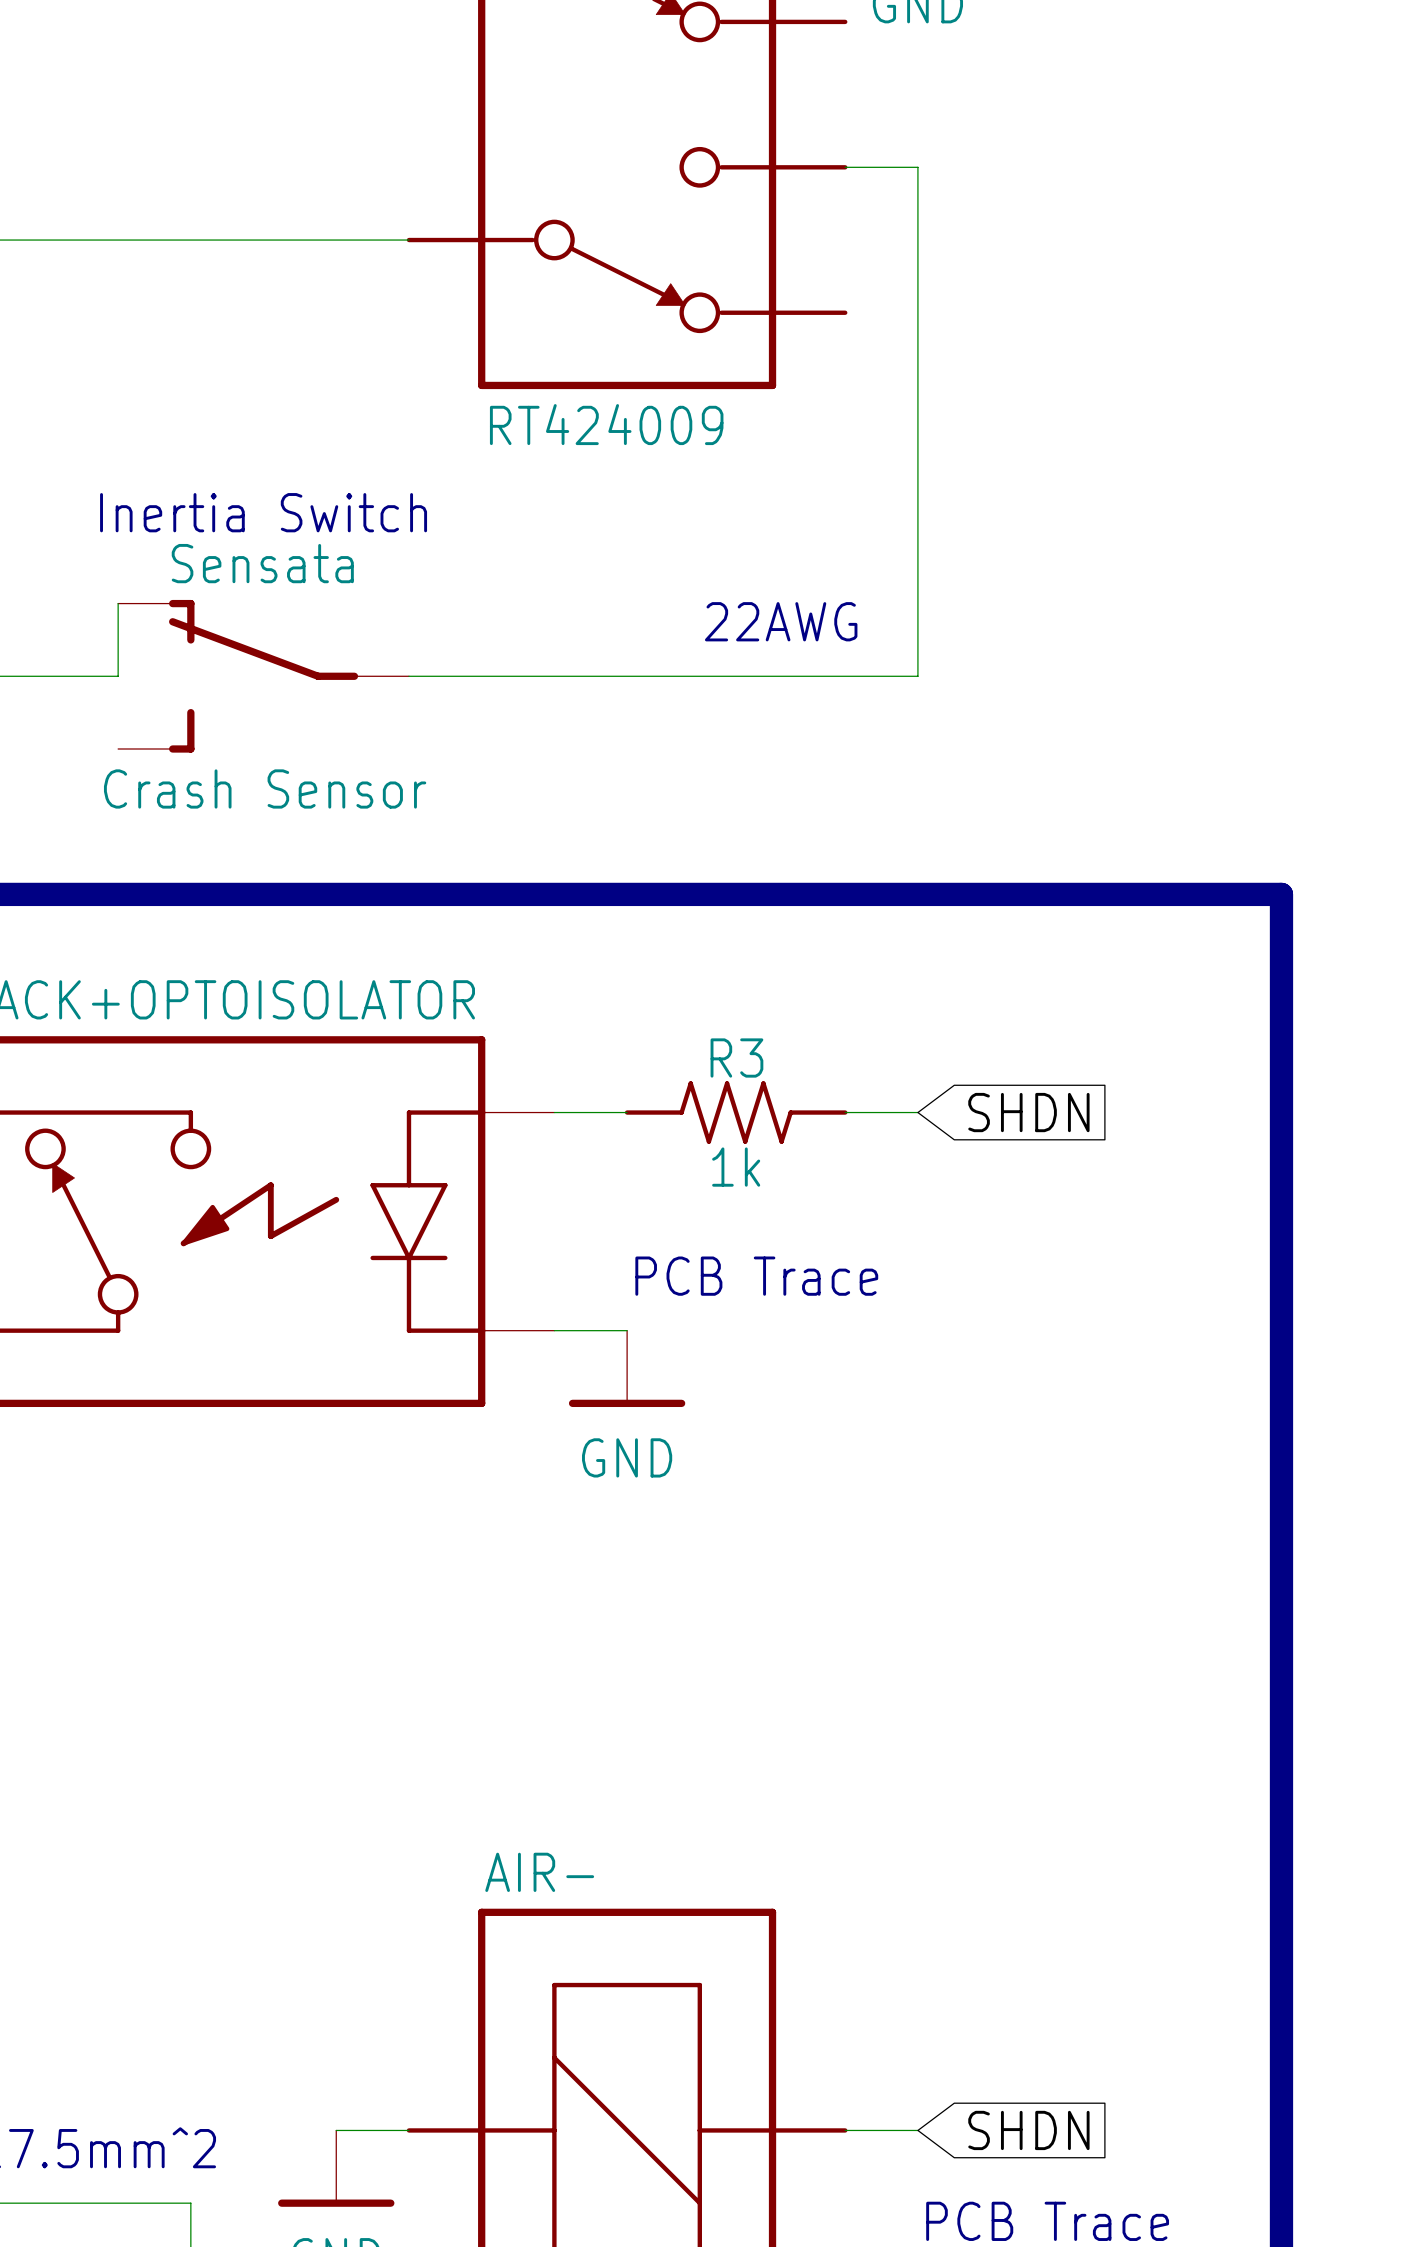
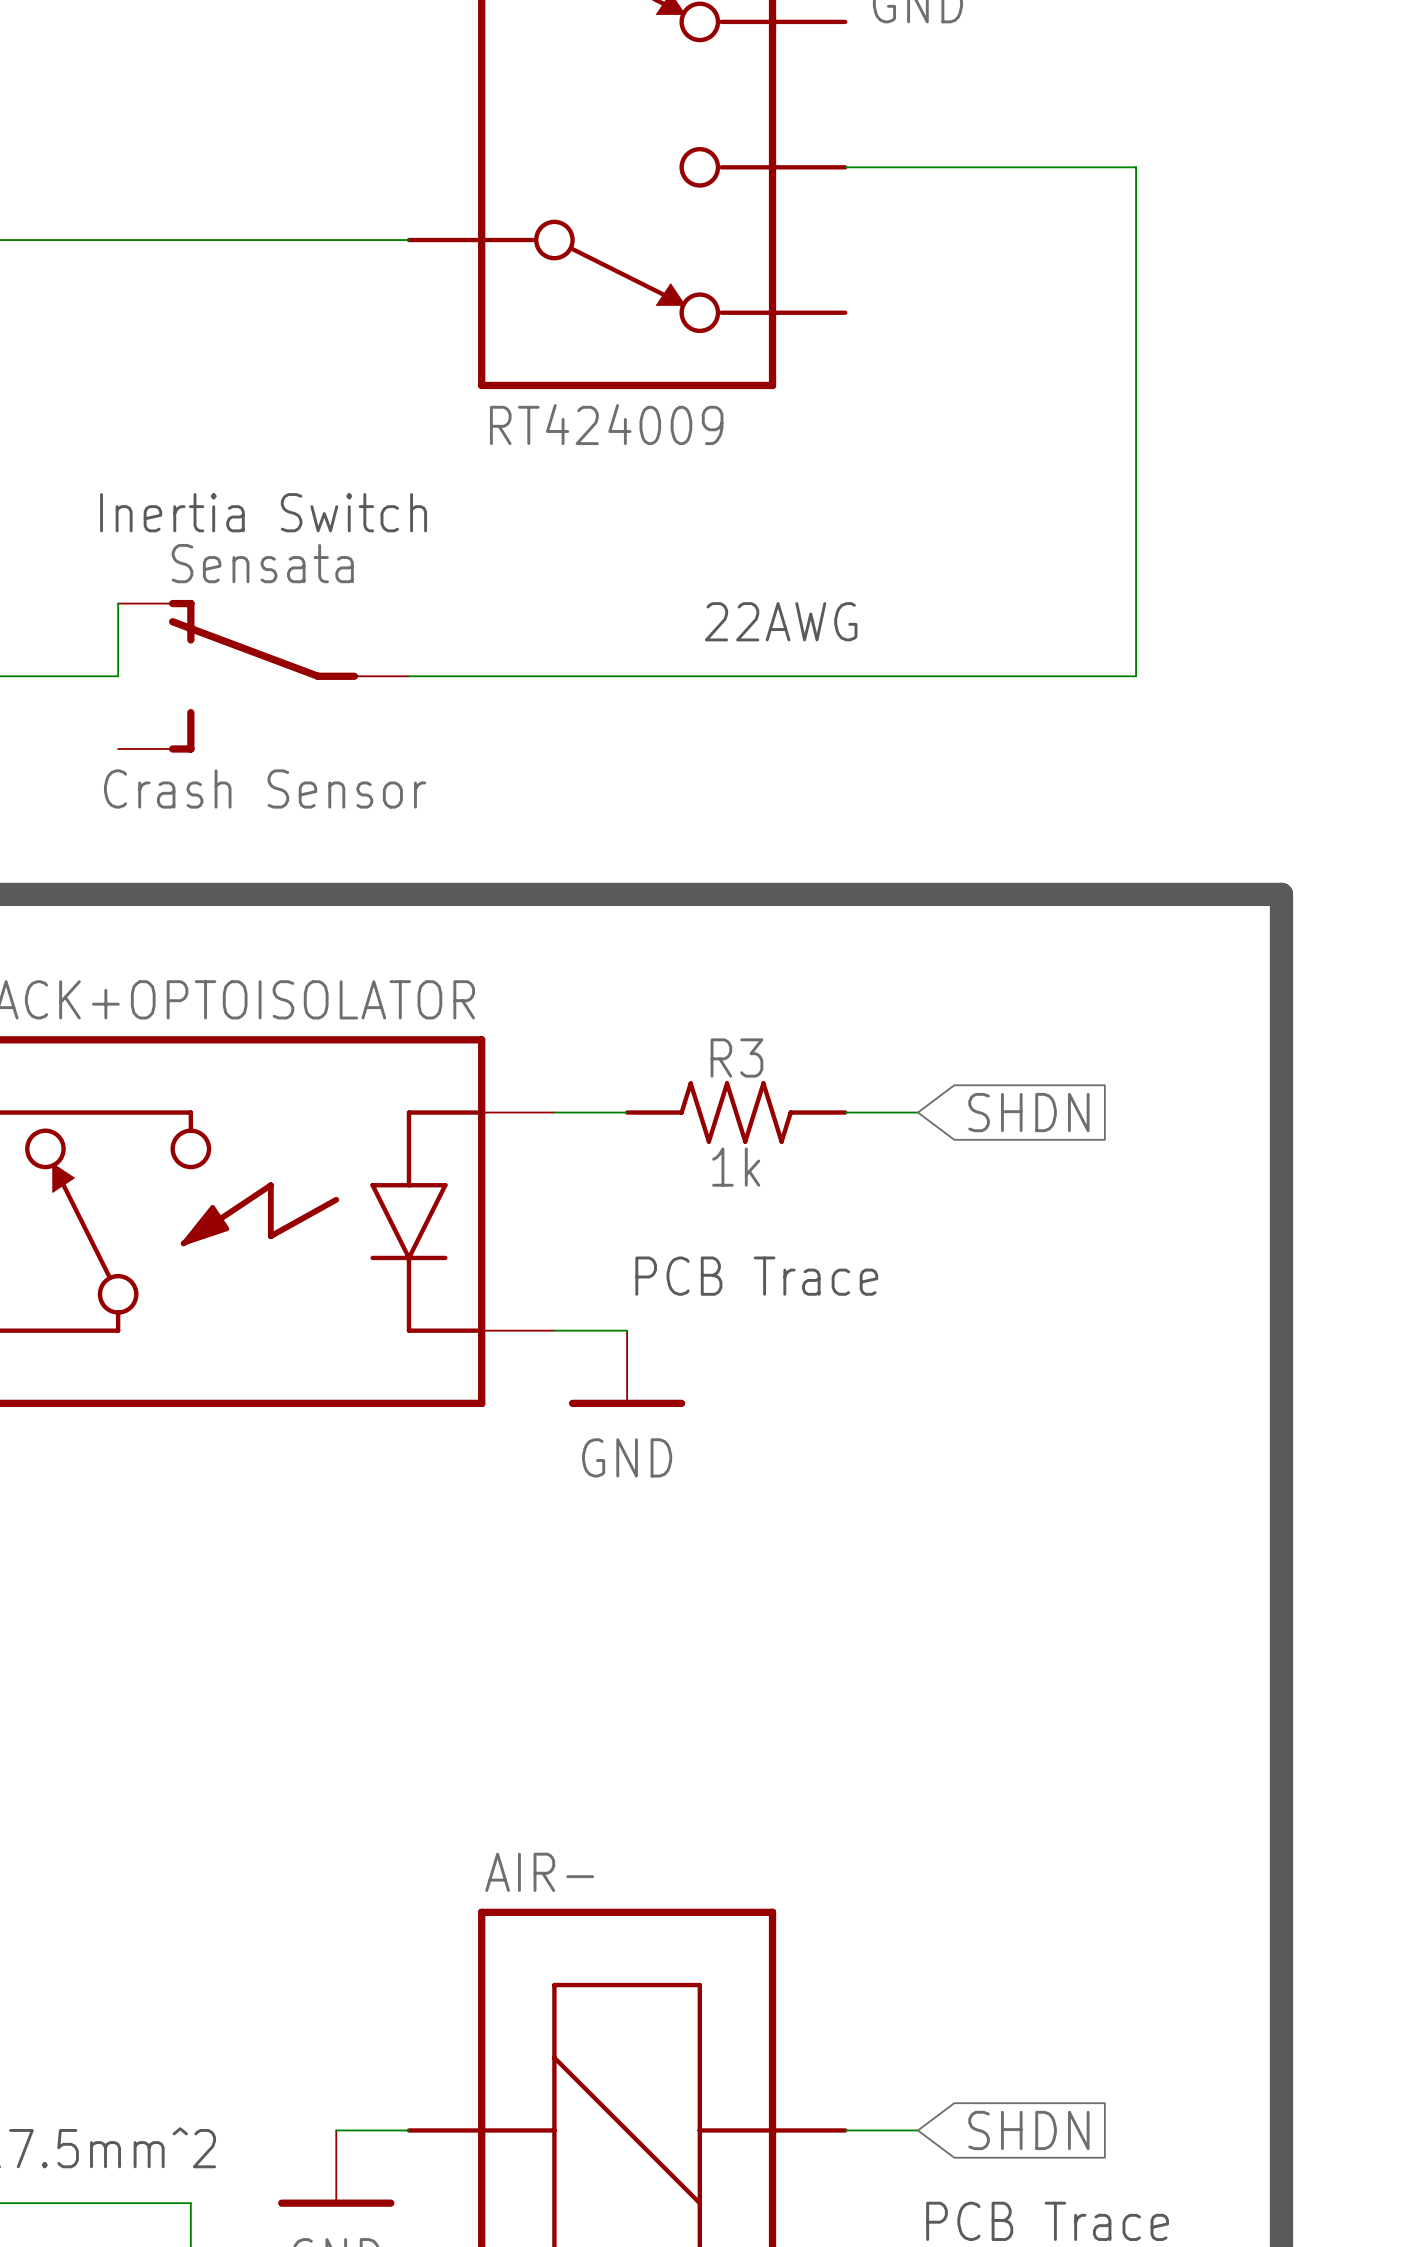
wire: (917, 167) (917, 676) -> (917, 167) (1136, 167) (1136, 676) (917, 676)

